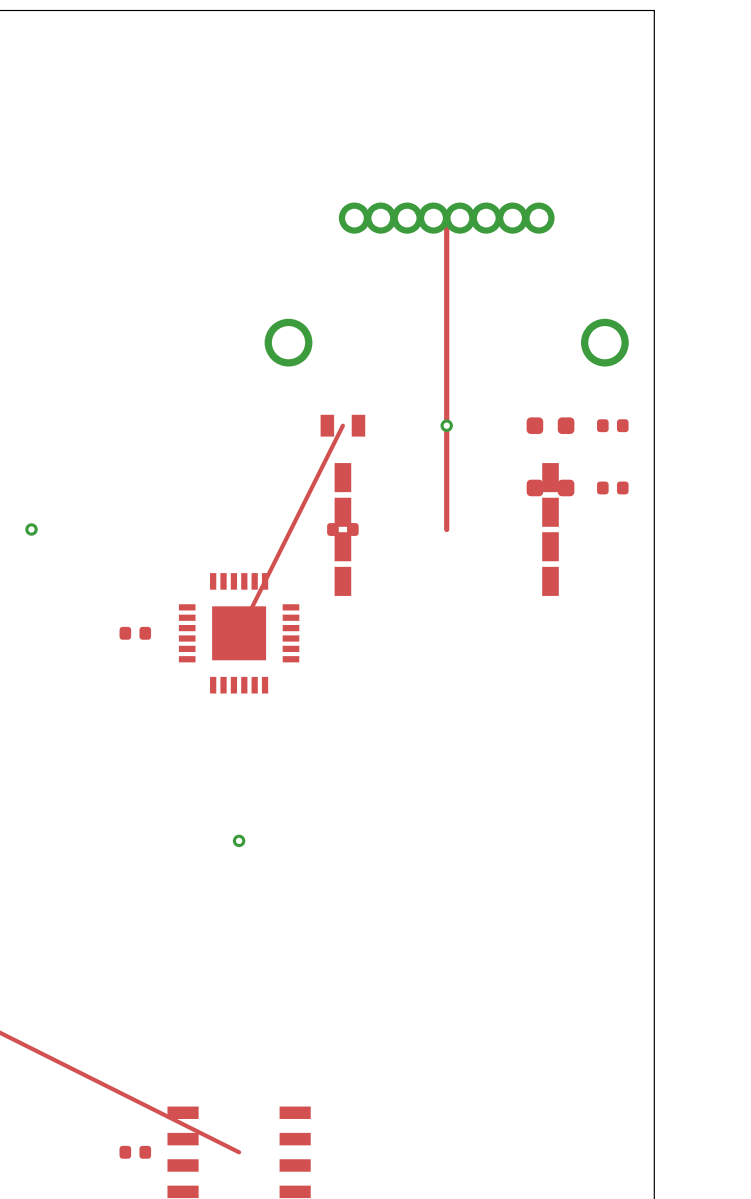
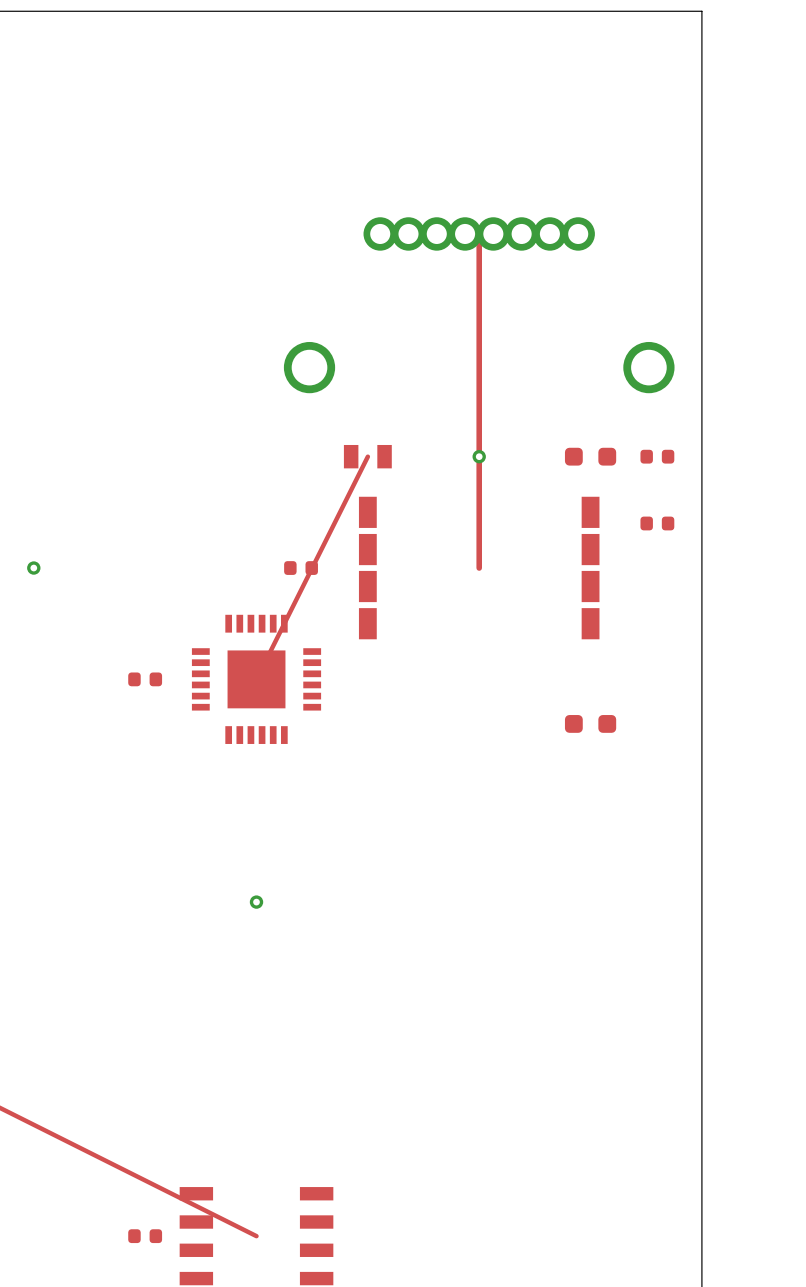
part position: (550, 487) -> (590, 723)
part position: (342, 529) -> (301, 568)

